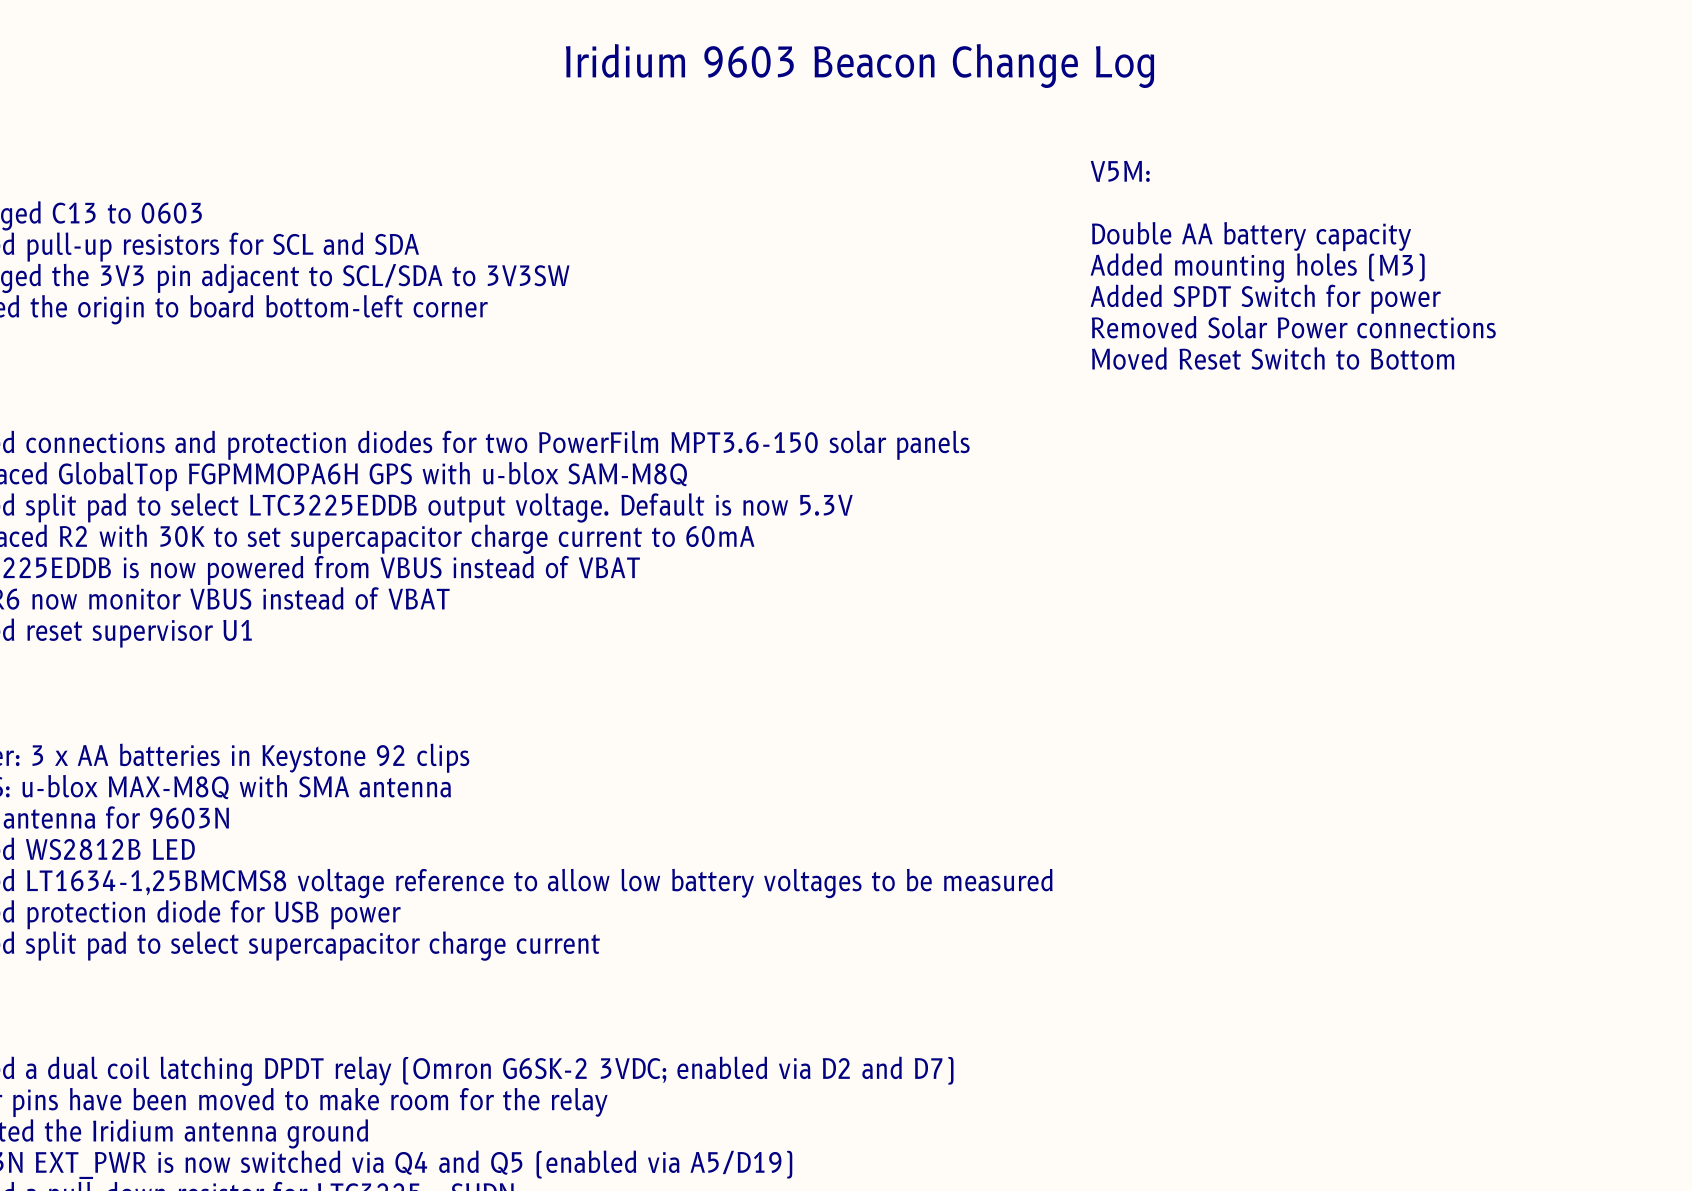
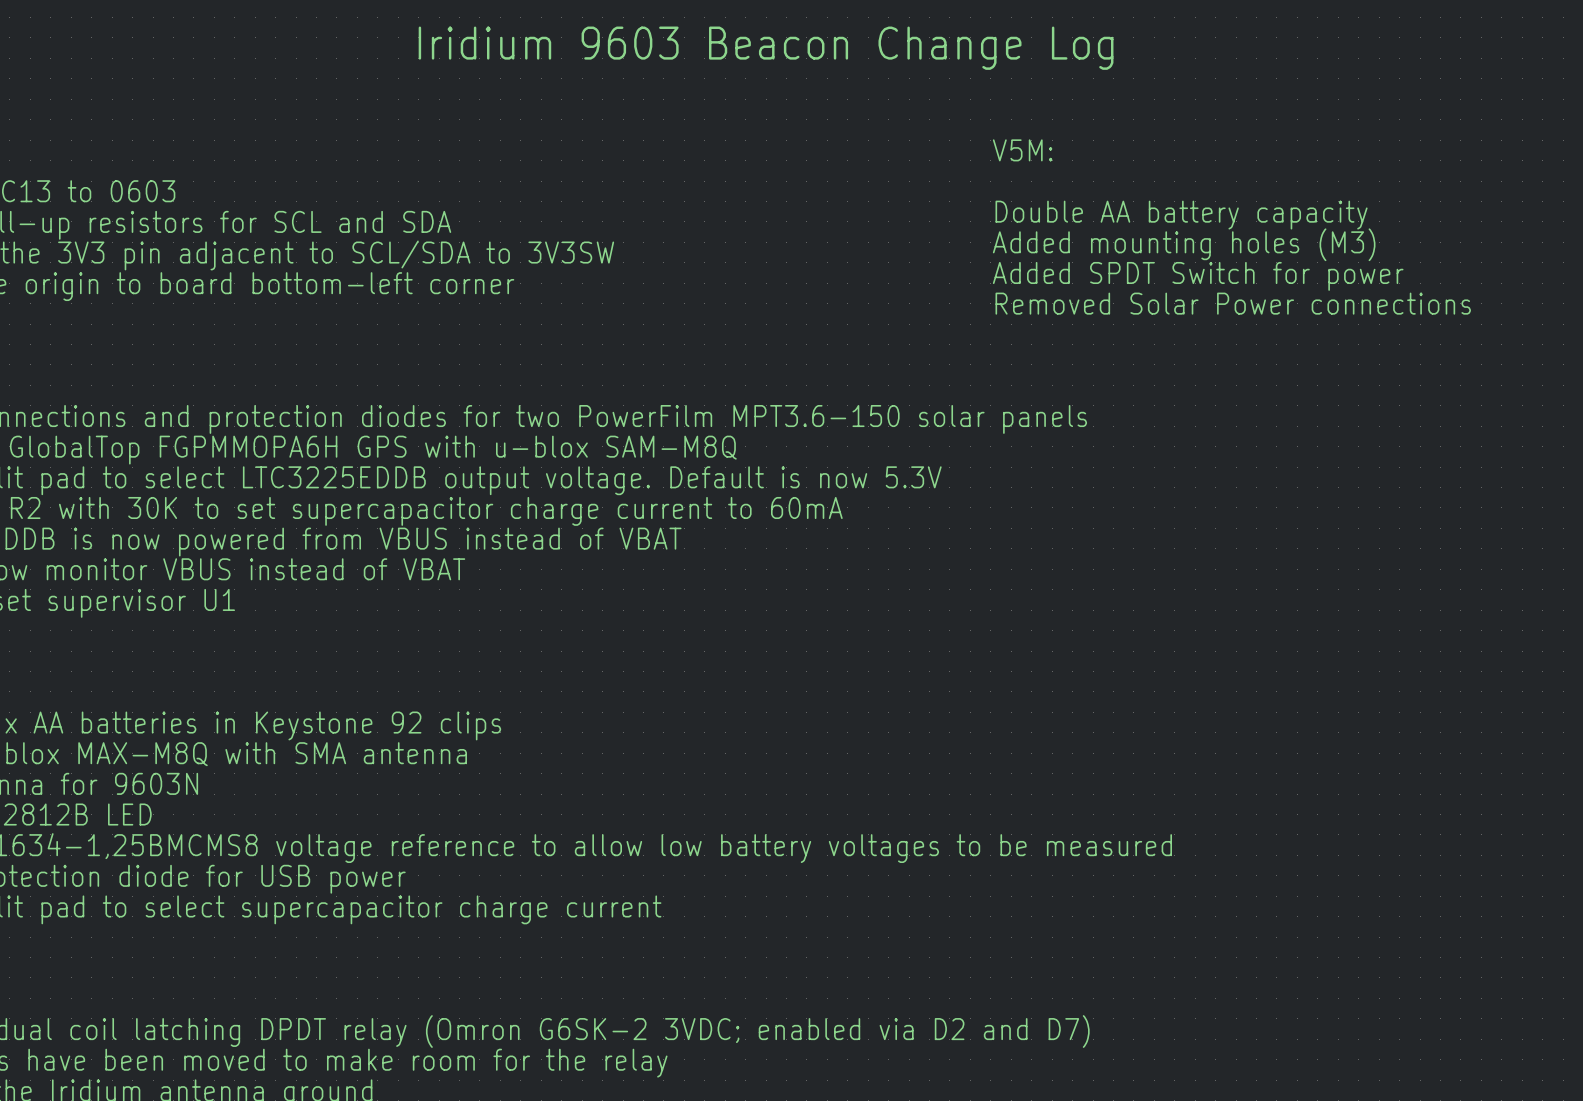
text: Moved Reset Switch to Bottom (1273, 358) -> none

